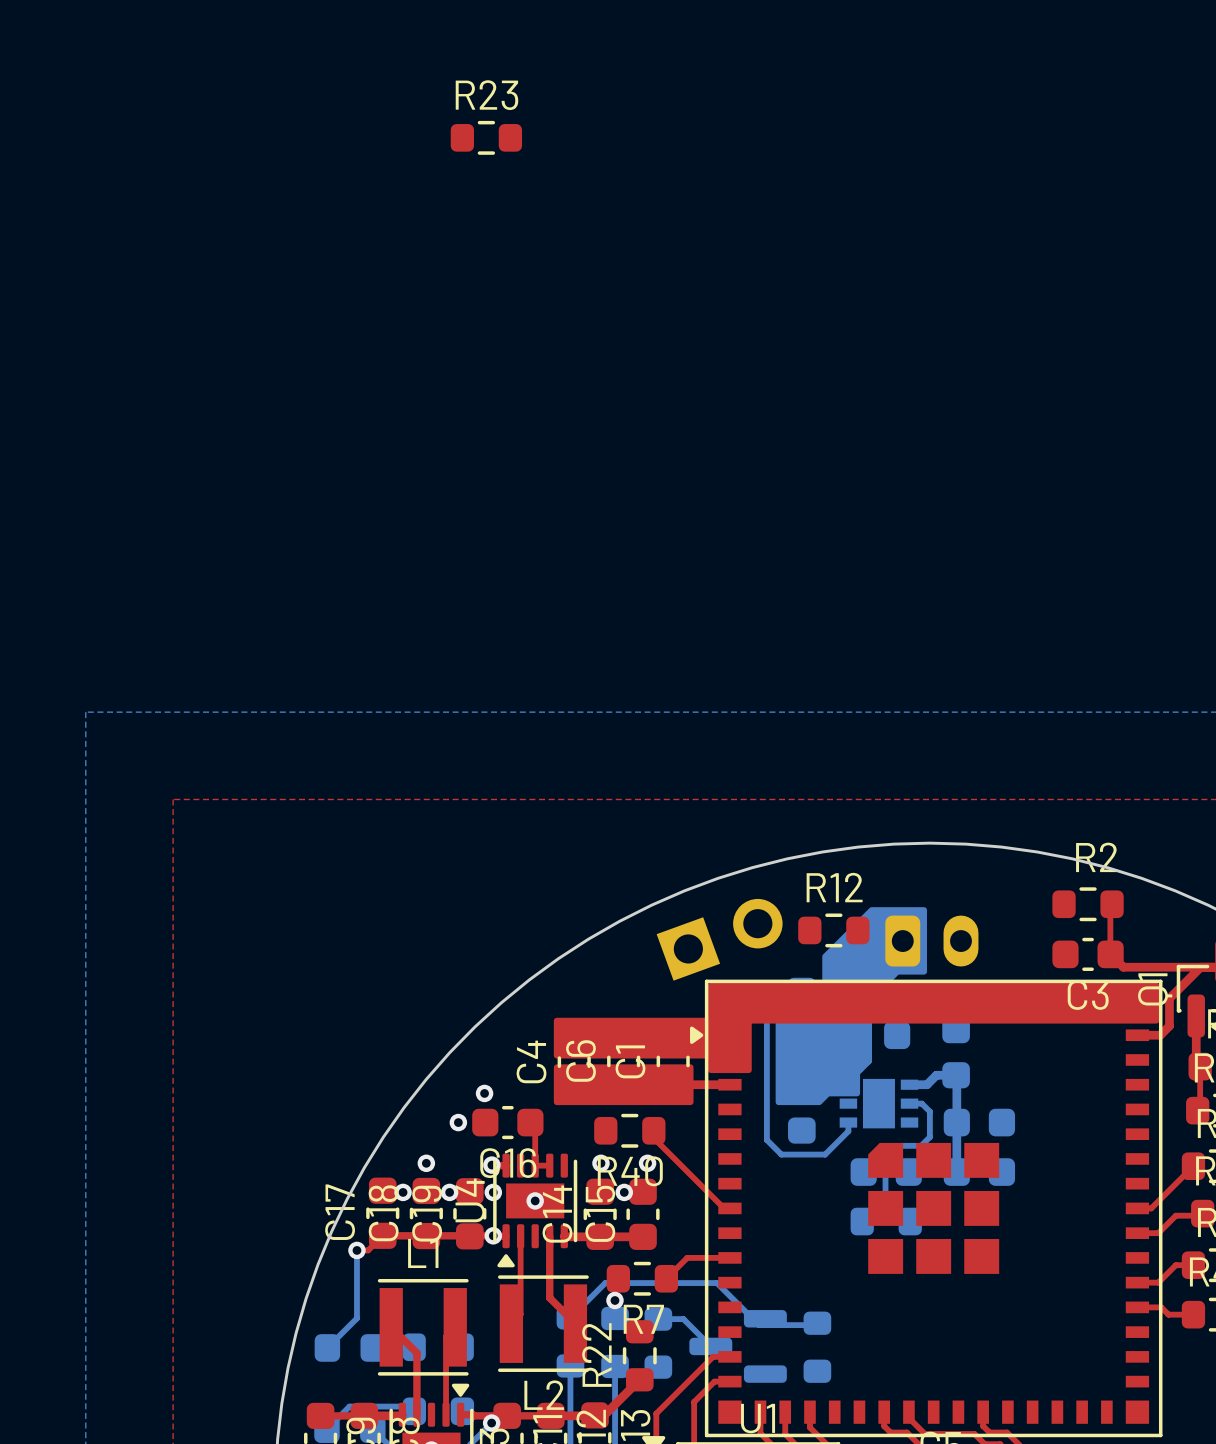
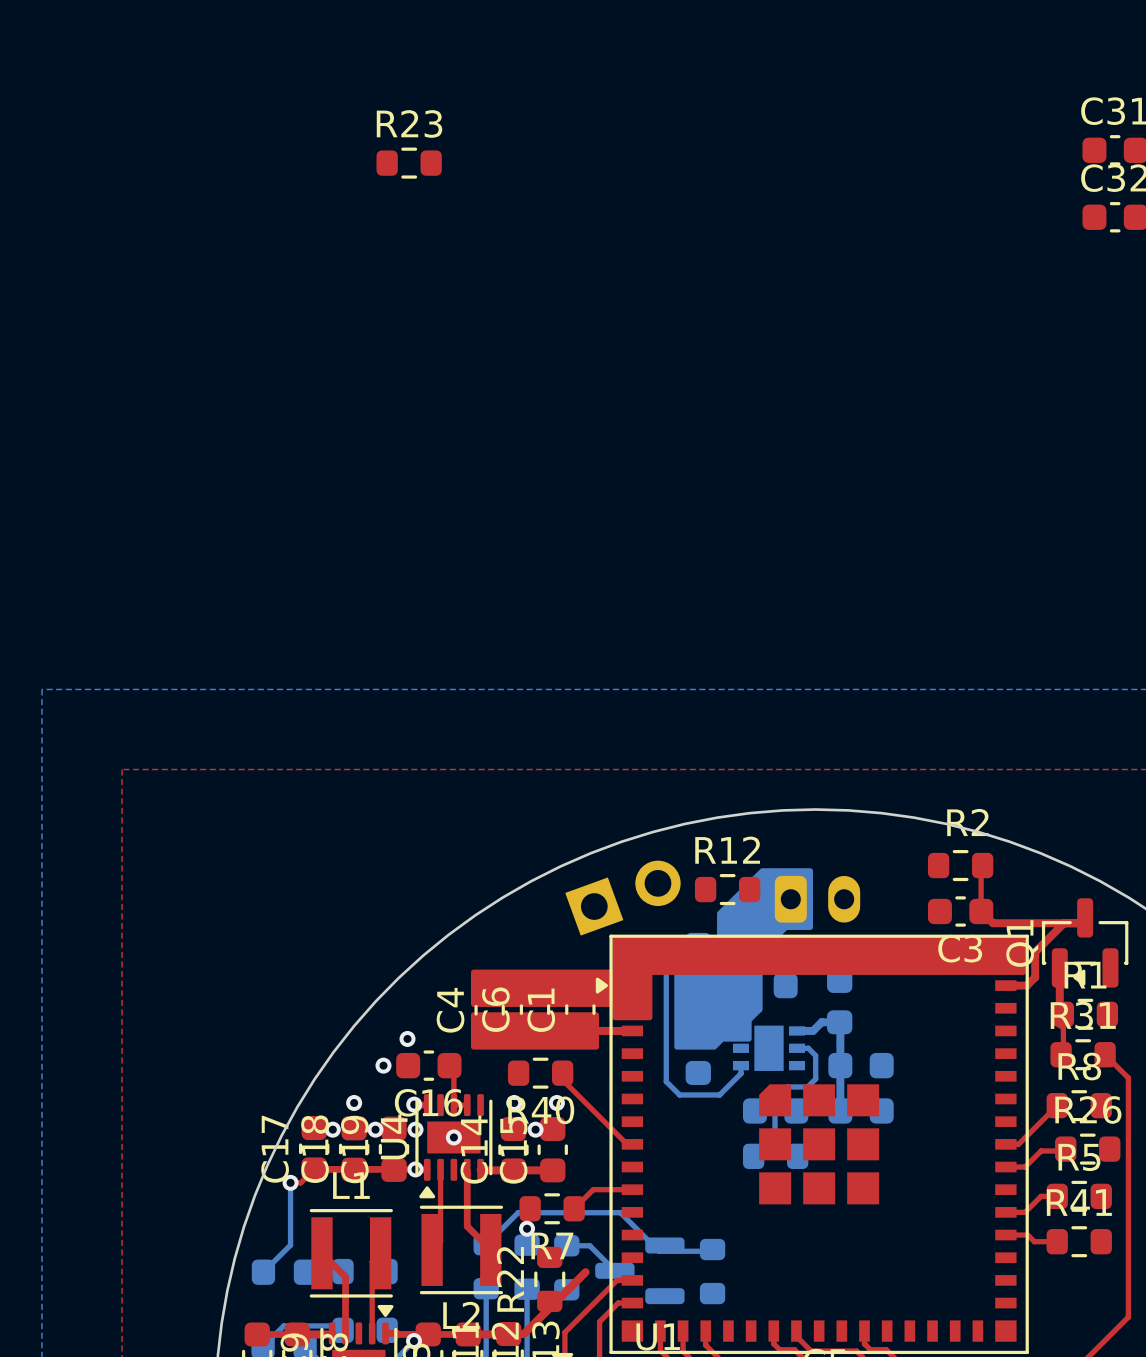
top track: (639, 1379) (604, 1415) -> (585, 1272) (523, 1334) (517, 1334)

